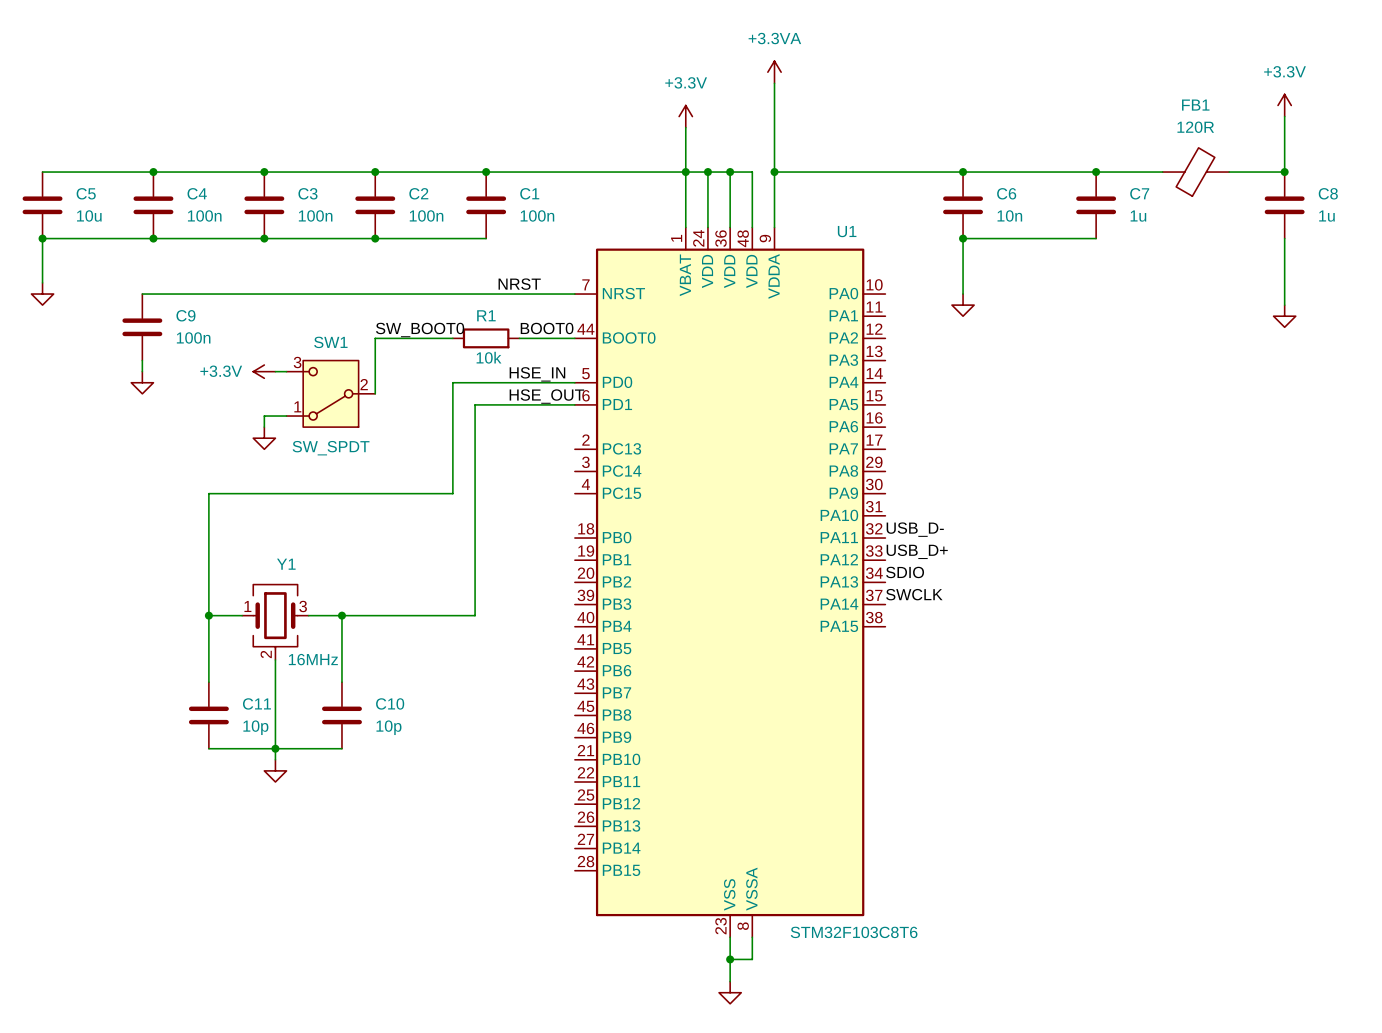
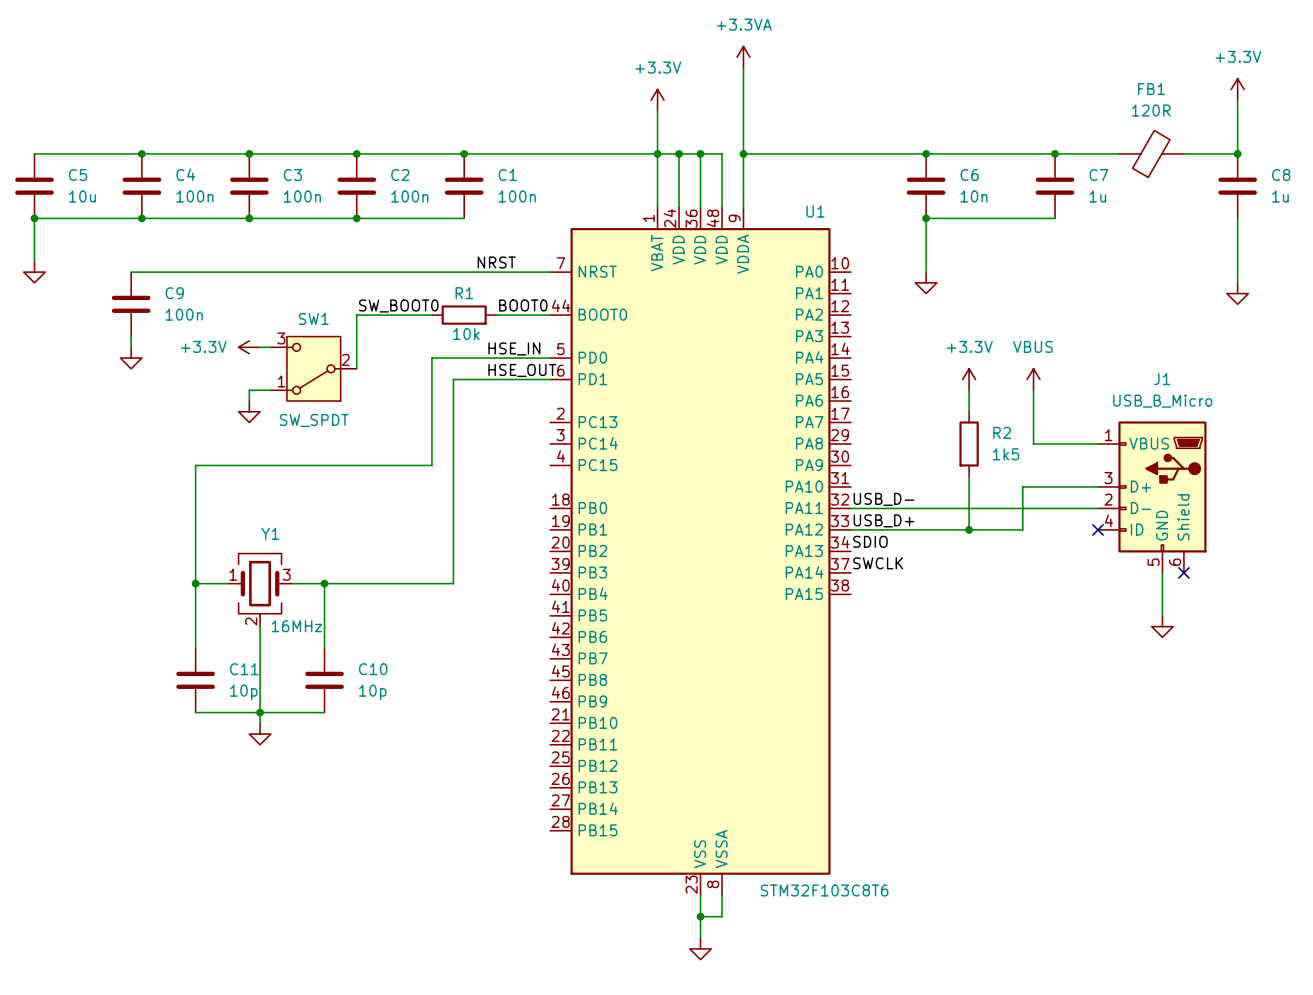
power symbol: none -> +3.3V (969, 379)
power symbol: none -> VBUS (1033, 379)
wire: none -> (969, 390) (969, 411)
wire: none -> (1033, 390) (1033, 443) (1098, 443)
R2: none -> 1k5 (969, 443)
wire: none -> (969, 476) (969, 529)
wire: none -> (1098, 486) (1022, 486) (1022, 529) (850, 529)
J1: none -> USB_B_Micro (1152, 497)
wire: none -> (850, 508) (1098, 508)
junction: none -> (969, 529)
no-connect mark: none -> (1098, 529)
wire: none -> (1162, 572) (1162, 615)
no-connect mark: none -> (1183, 572)
power symbol: none -> (1162, 626)

